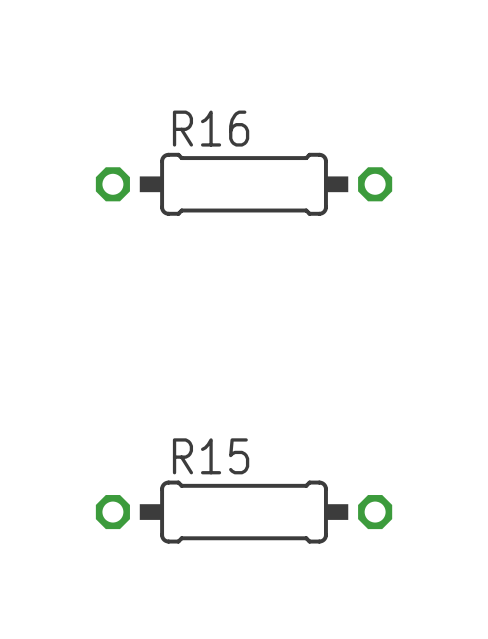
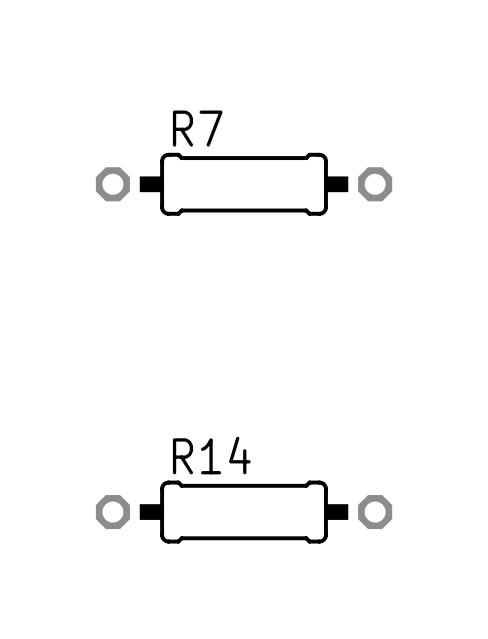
R16 name: R16 (211, 128) -> R7 (197, 128)
R15 name: R15 (211, 456) -> R14 (211, 455)

